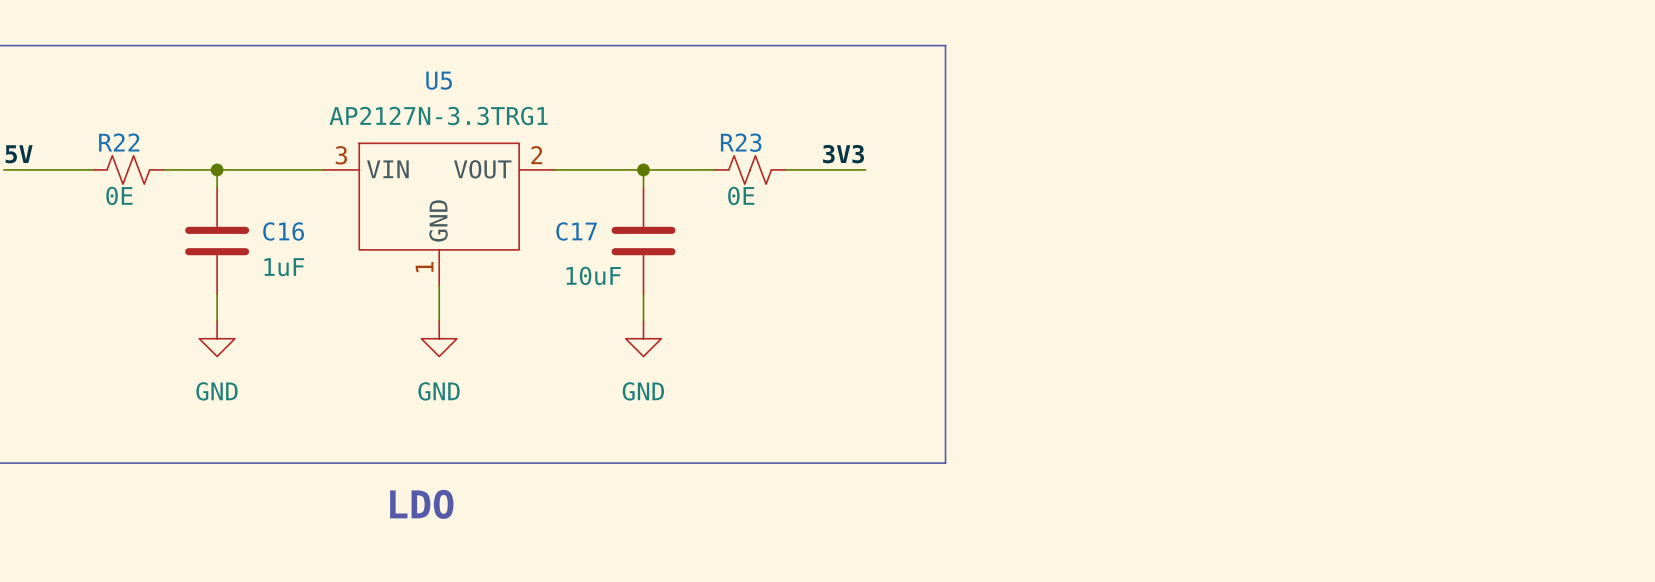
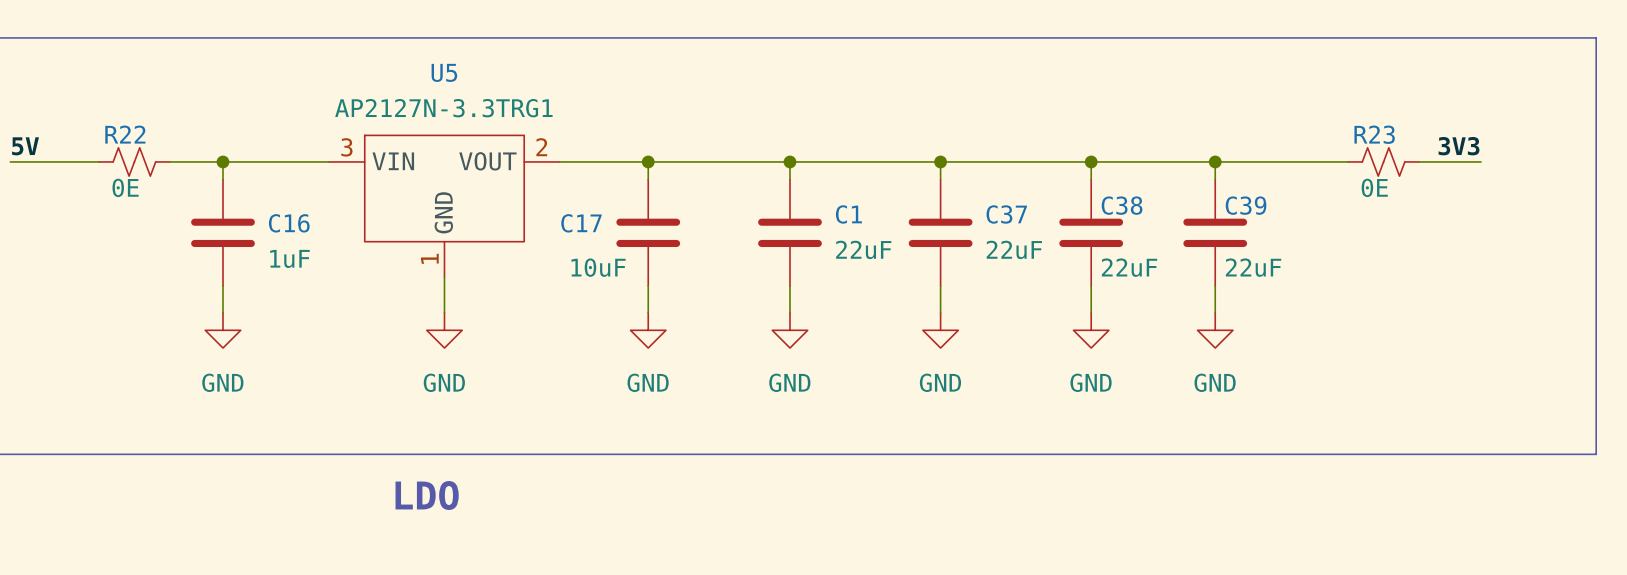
bus: (945, 45) (945, 463) -> (949, 37) (1596, 37) (1596, 454) (949, 454)
label: 3V3 (843, 154) -> none
label: none -> 3V3 (1459, 146)
wire: none -> (719, 161) (789, 161) (789, 179)
R23 position: (750, 169) -> (1383, 161)
junction: none -> (789, 161)
wire: none -> (869, 161) (1348, 161)
wire: none -> (940, 161) (940, 179)
junction: none -> (940, 161)
wire: none -> (1091, 161) (1091, 179)
junction: none -> (1091, 161)
wire: none -> (1215, 161) (1215, 179)
junction: none -> (1215, 161)
wire: none -> (1419, 161) (1481, 161)
C1: none -> 22uF (789, 232)
C37: none -> 22uF (940, 232)
C38: none -> 22uF (1091, 232)
C39: none -> 22uF (1215, 232)
wire: none -> (789, 286) (789, 312)
wire: none -> (940, 286) (940, 312)
wire: none -> (1091, 286) (1091, 312)
wire: none -> (1215, 286) (1215, 312)
power symbol: none -> GND (789, 330)
power symbol: none -> GND (940, 330)
power symbol: none -> GND (1091, 330)
power symbol: none -> GND (1215, 330)

